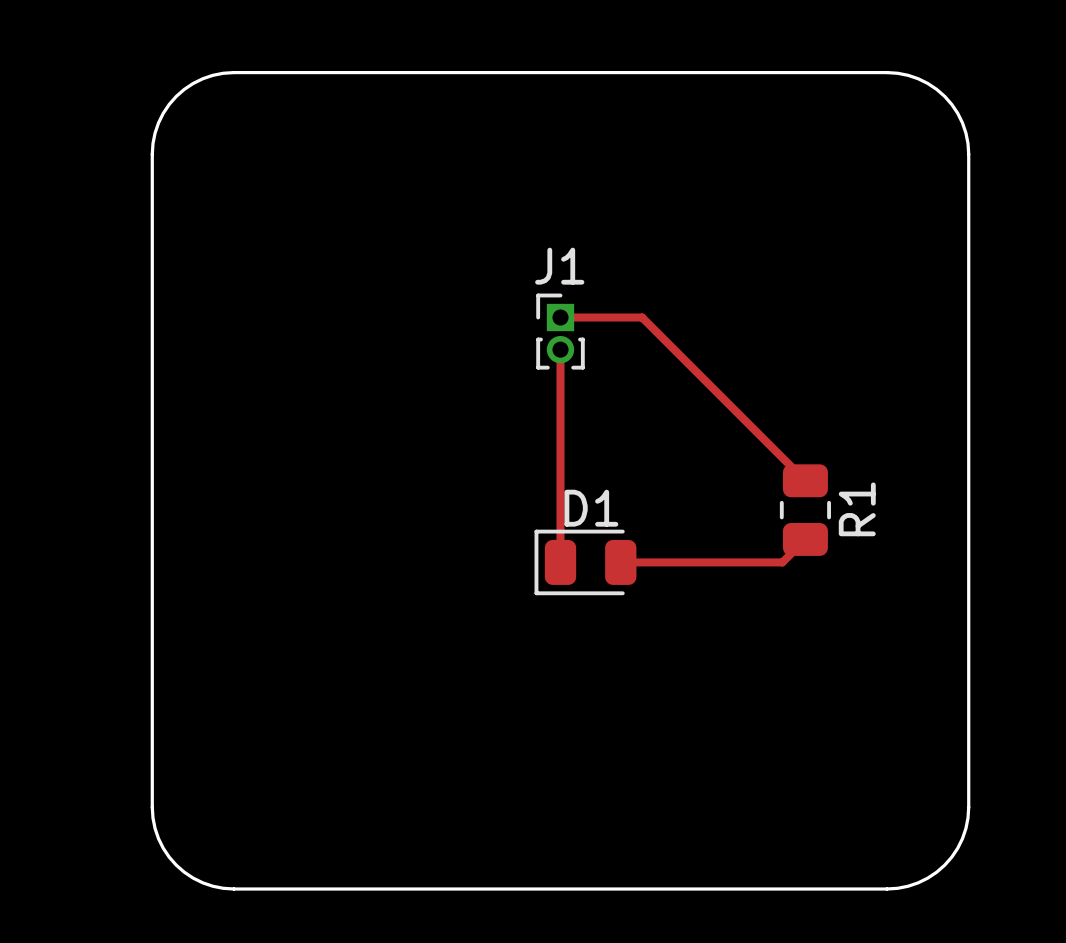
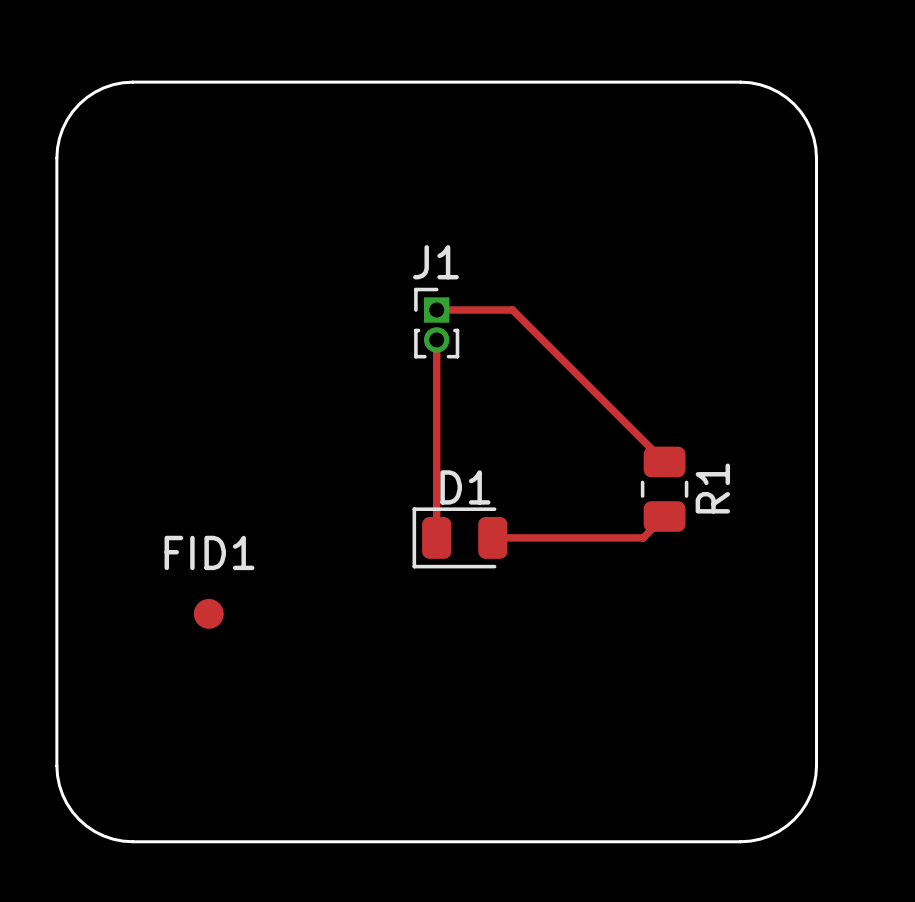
FID1: none -> (208, 613)

